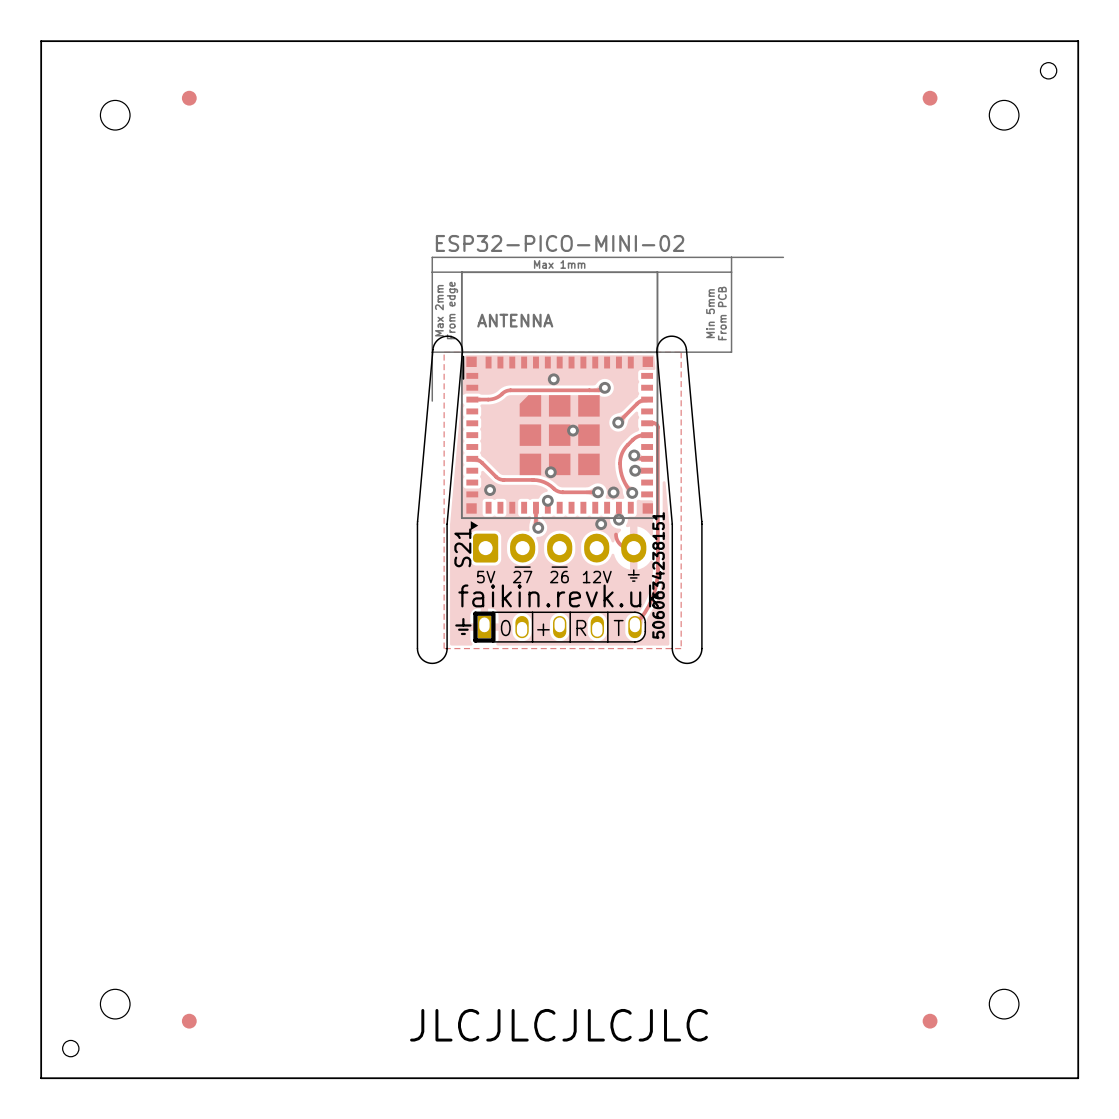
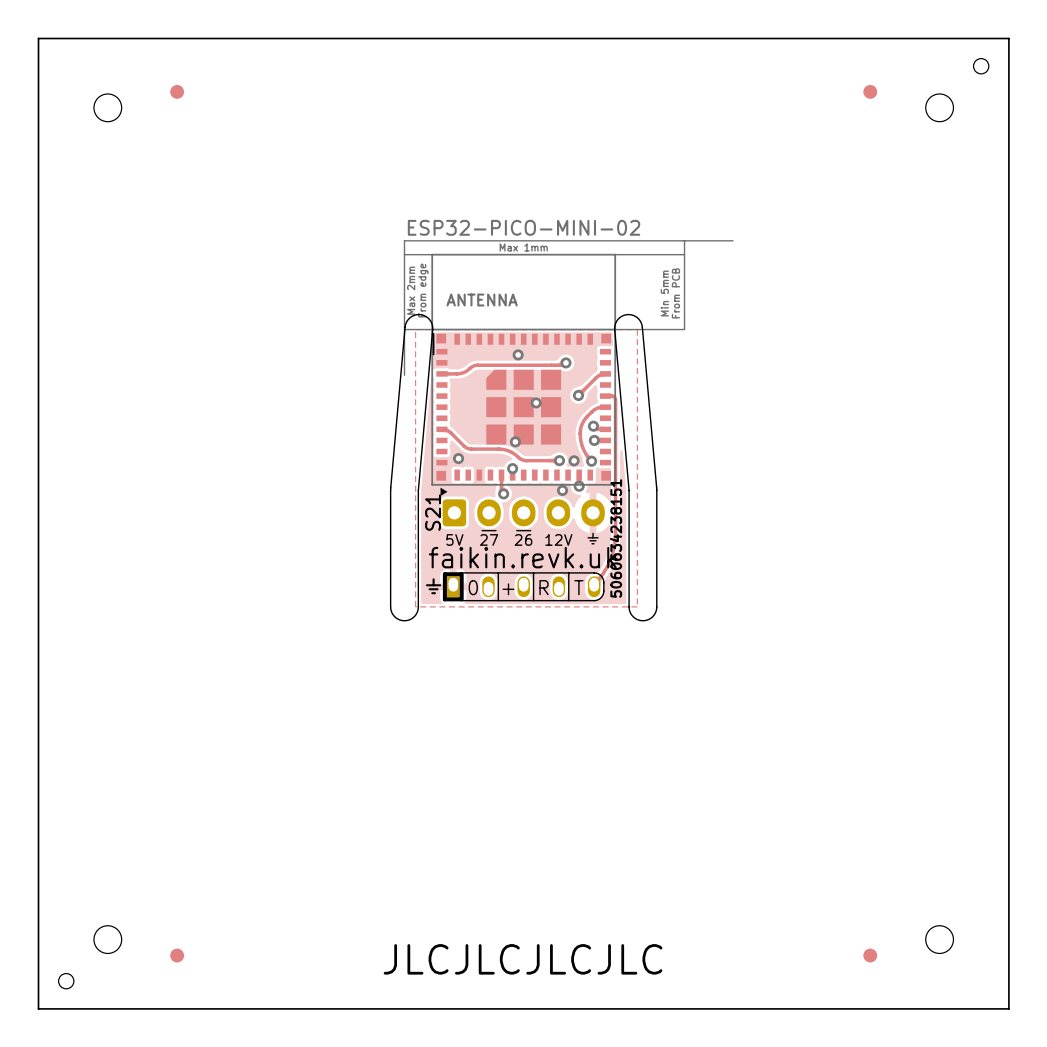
track: (615, 534) (619, 544) (629, 548) -> none

